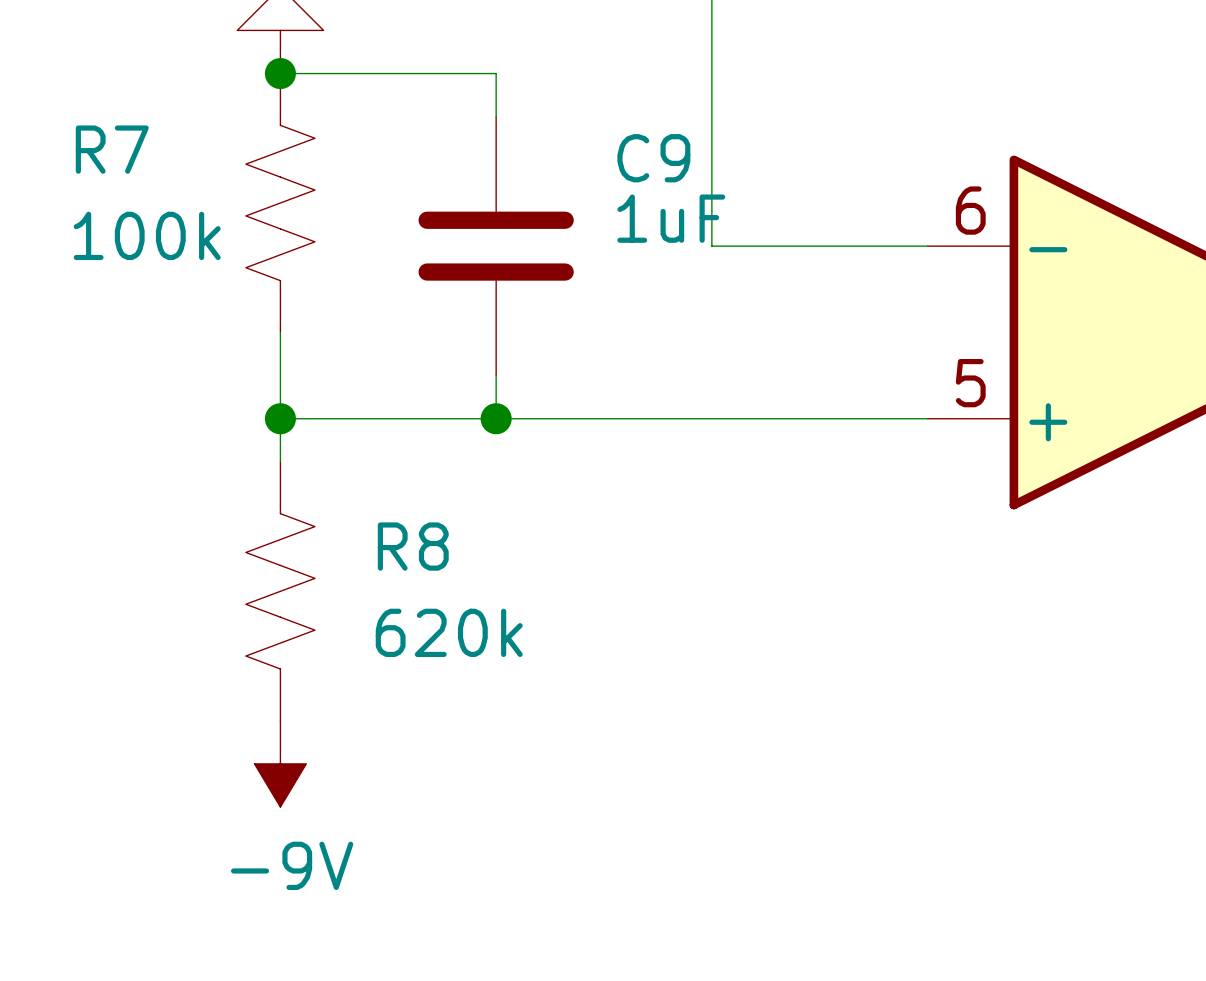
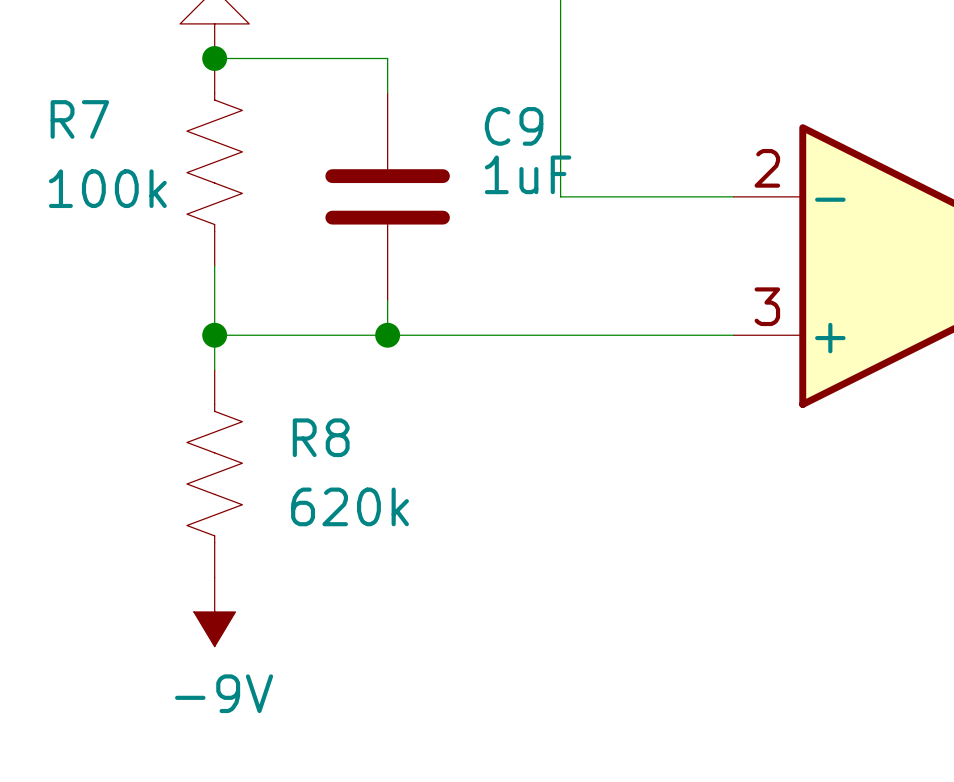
part pin number: 6 (970, 210) -> 2 (767, 168)
part pin number: 5 (970, 383) -> 3 (767, 306)

